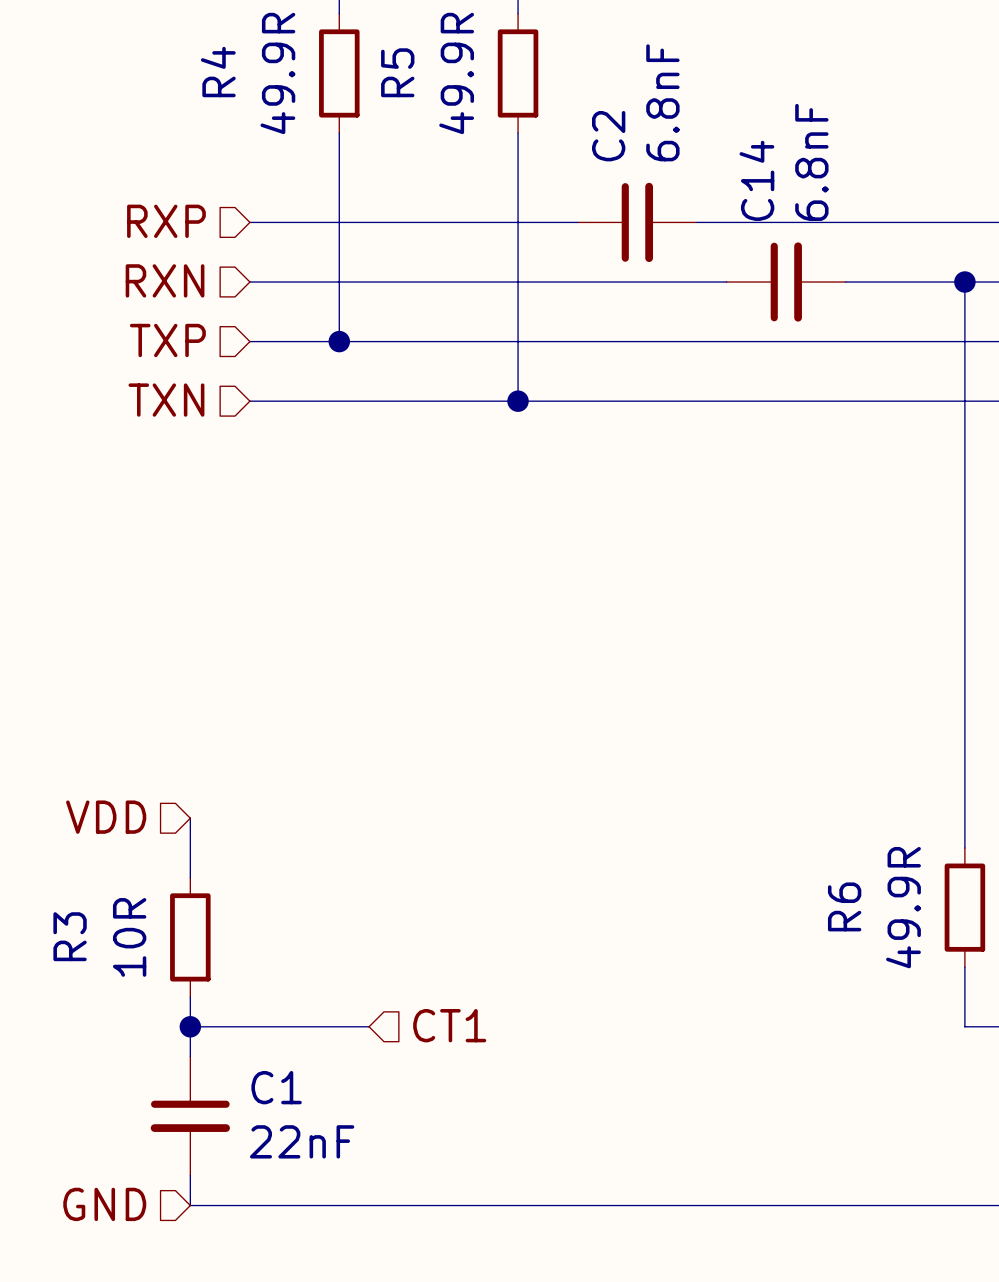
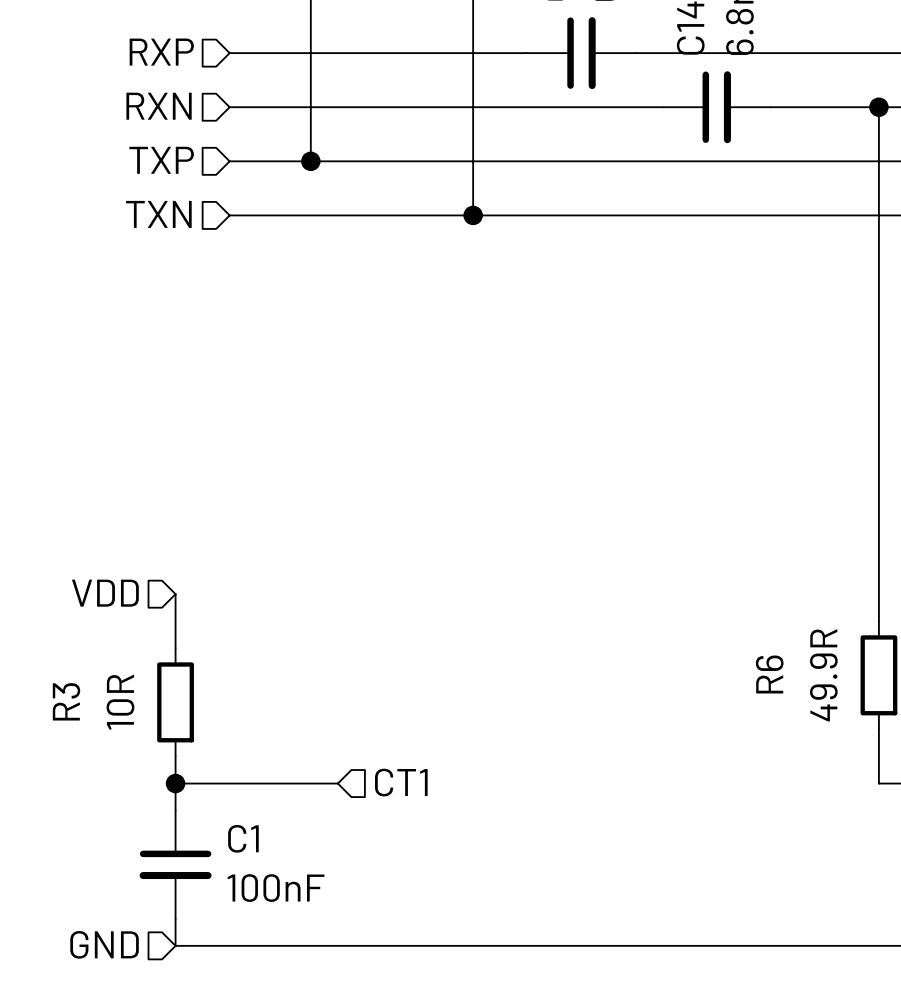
C1 value: 22nF (302, 1141) -> 100nF (276, 888)

